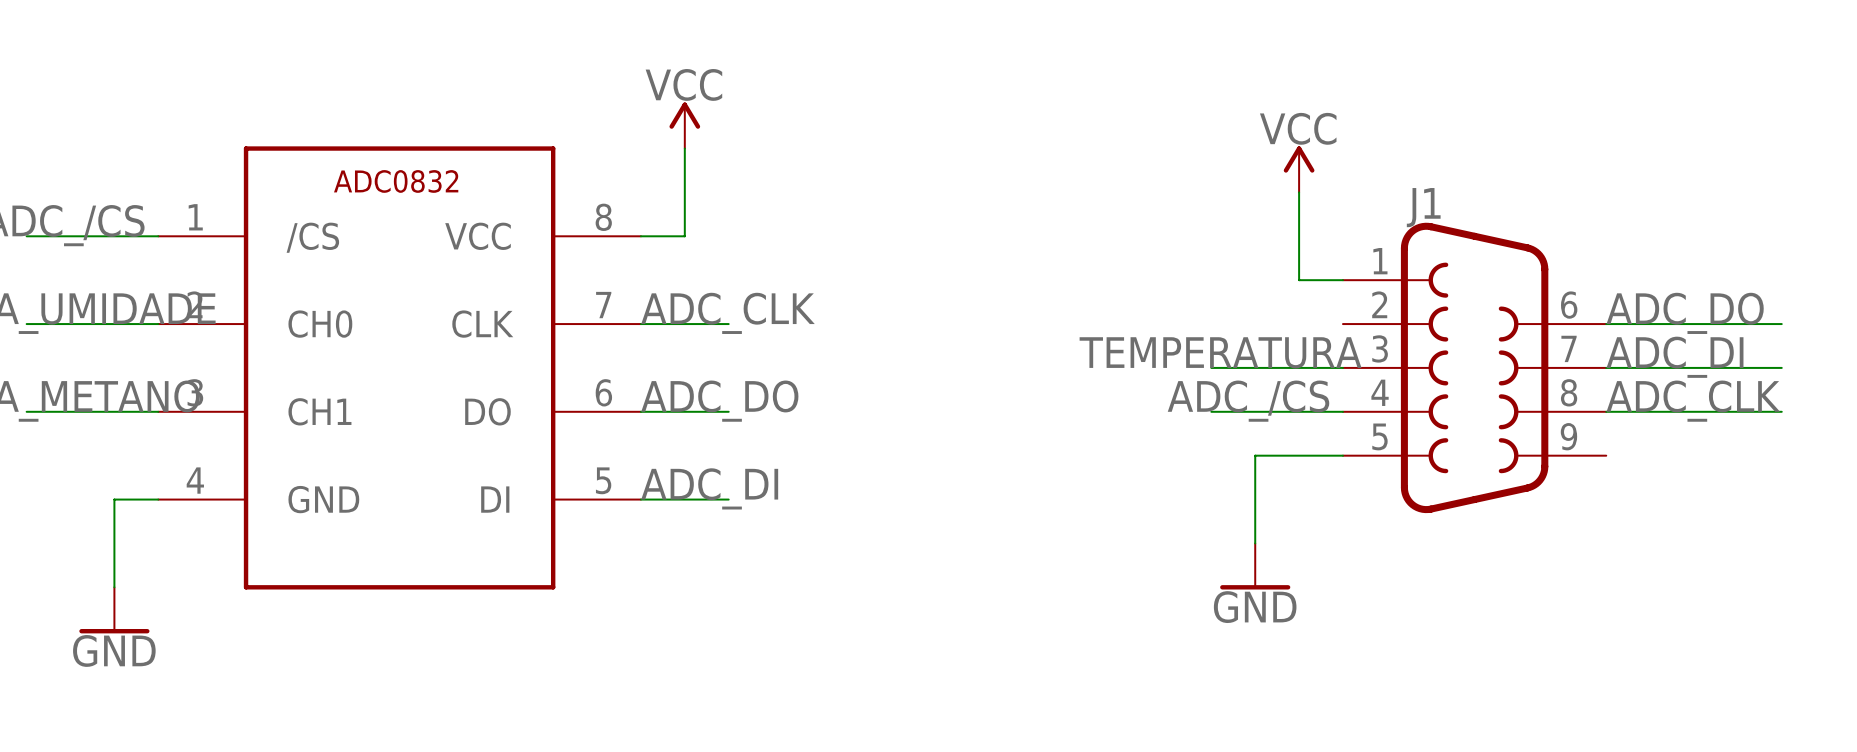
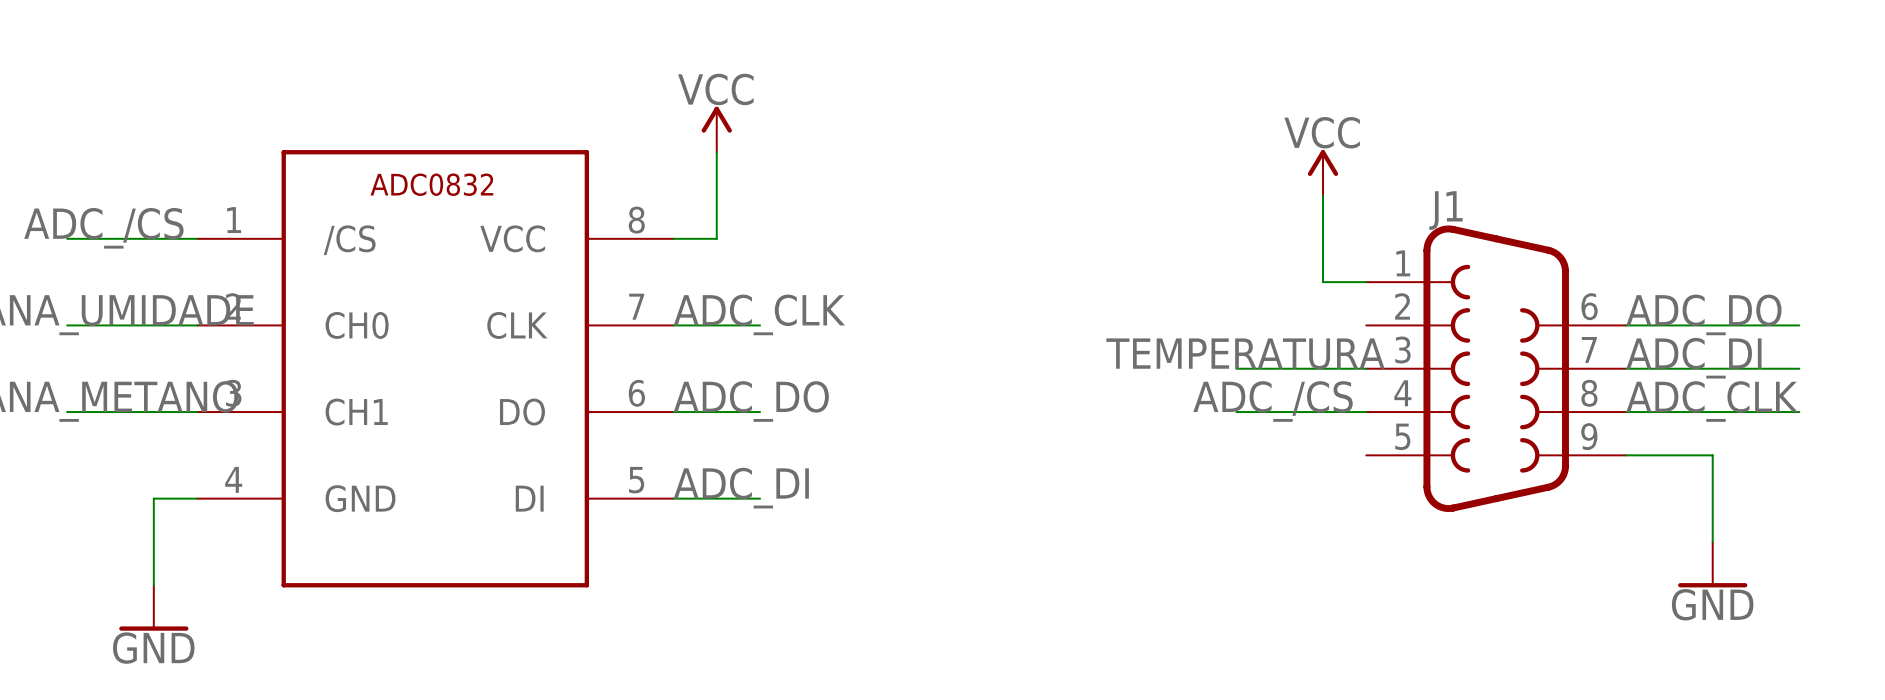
wire: (1342, 455) (1255, 455) (1255, 543) -> none
wire: none -> (1626, 455) (1712, 455) (1712, 541)
power symbol: GND (1255, 566) -> none
power symbol: none -> GND (1712, 564)

